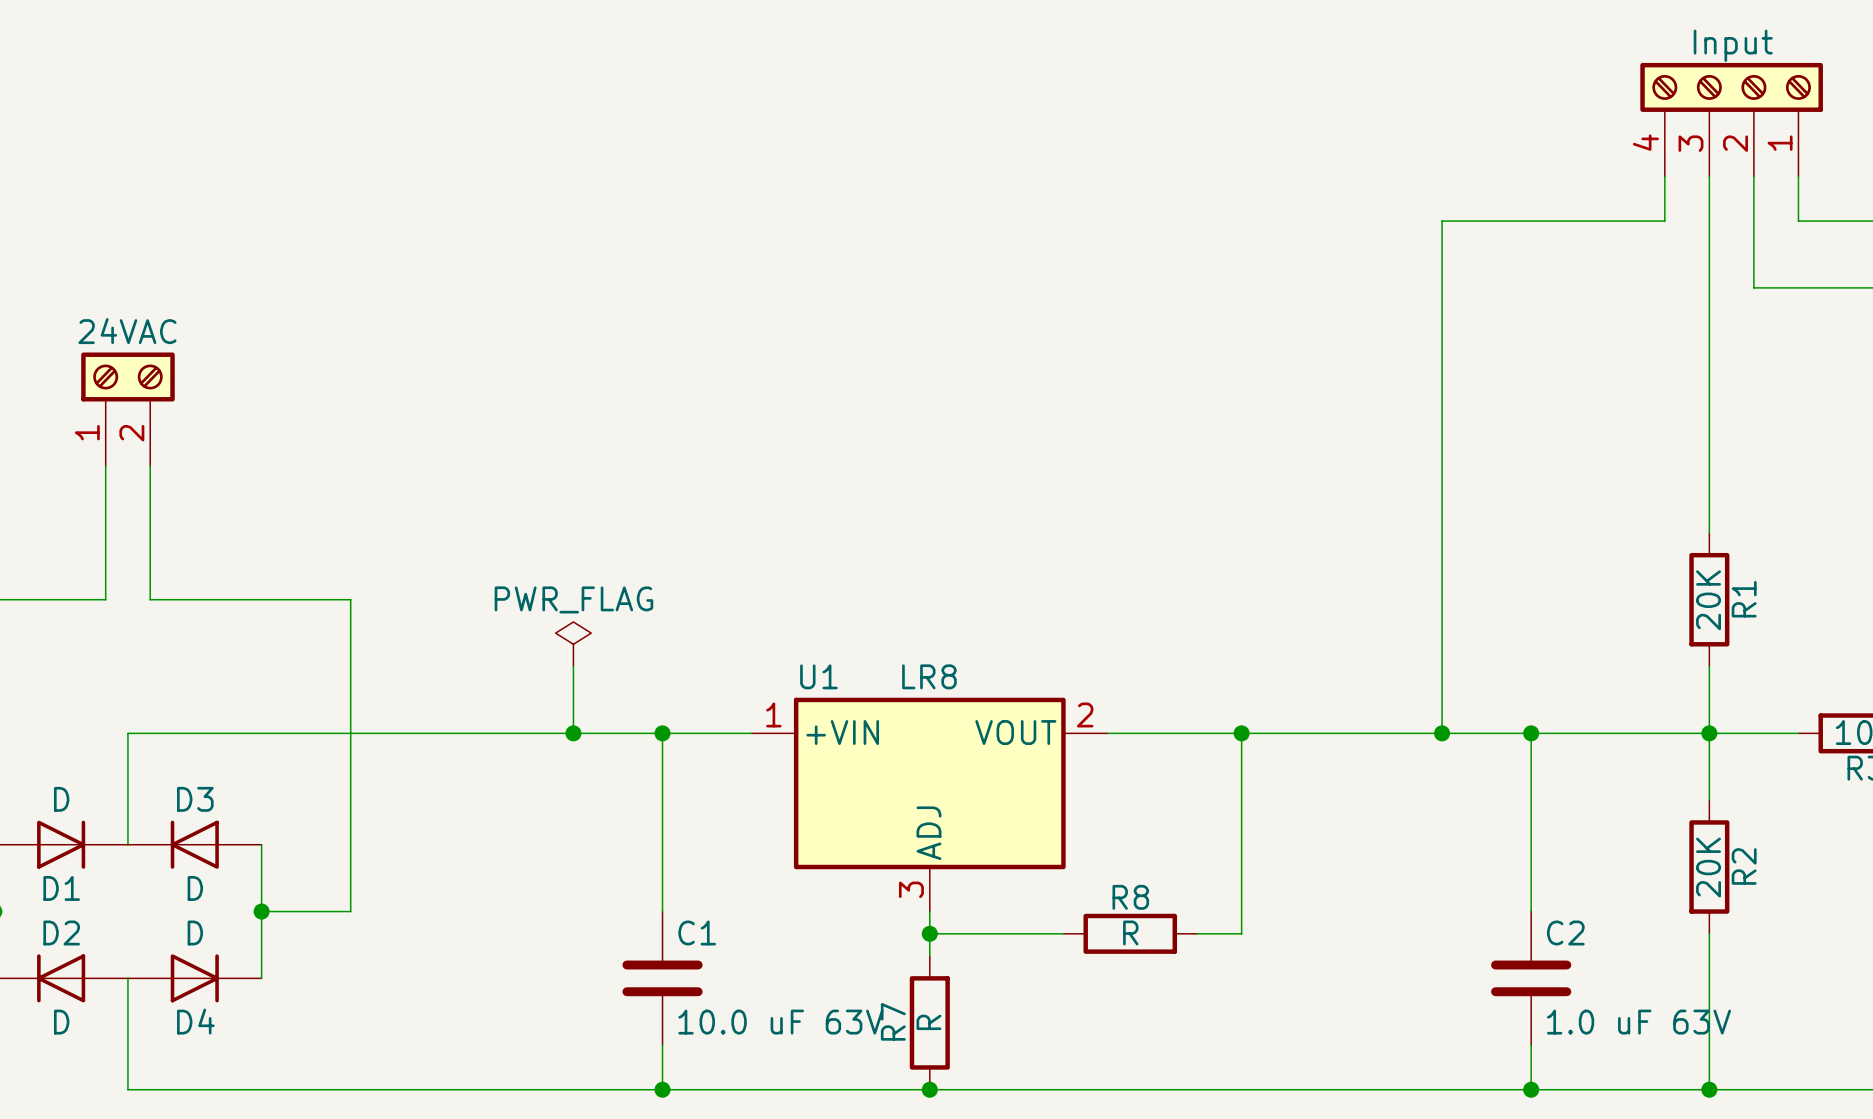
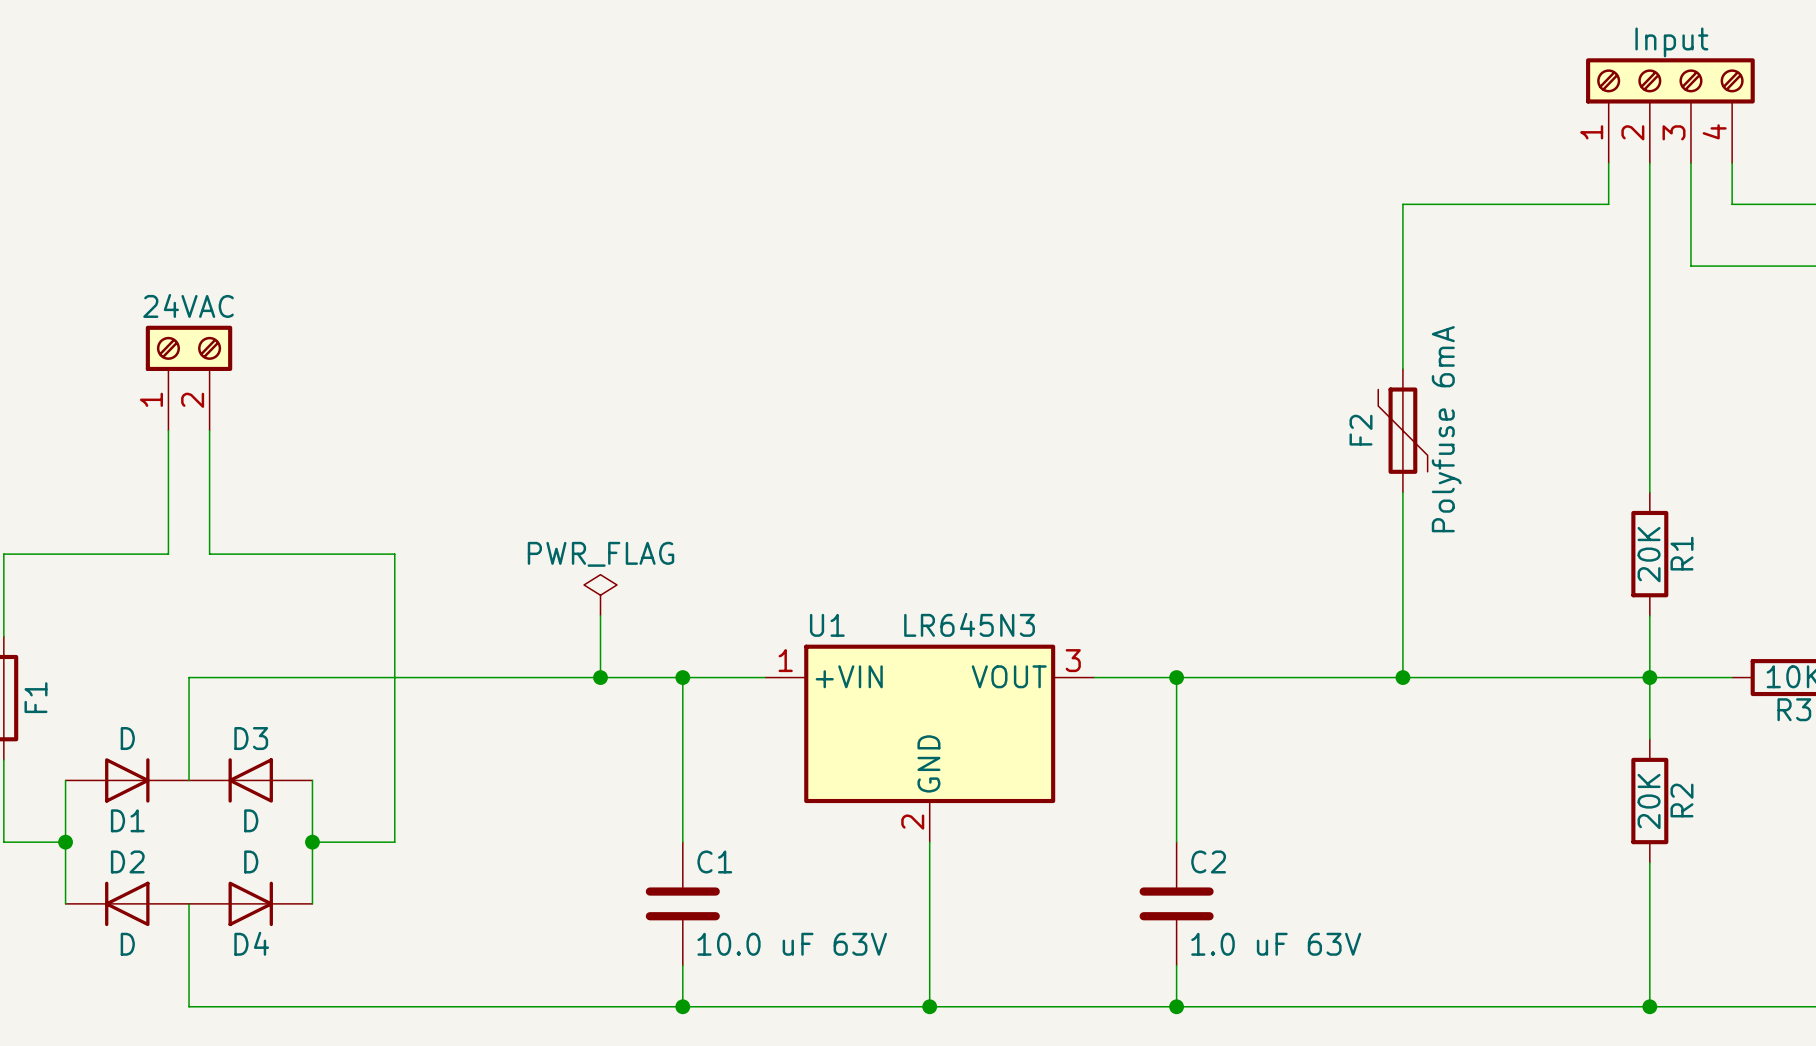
part flip: as is (1731, 87) -> left-right (1670, 80)
F2: none -> Polyfuse 6mA (1402, 430)
U1 value: LR8 (929, 676) -> LR645N3 (969, 624)
U1 pin number: 2 (1085, 714) -> 3 (1073, 660)
wire: (1241, 733) (1241, 933) (1197, 933) -> none
junction position: (1241, 733) -> (1176, 677)
wire: (1531, 733) (1531, 911) -> (1176, 677) (1176, 842)
junction: (1531, 733) -> none
U1 pin name: ADJ (928, 833) -> GND (928, 763)
U1 pin number: 3 (911, 889) -> 2 (912, 822)
wire: (929, 933) (1063, 933) -> none
junction: (929, 933) -> none
R8: R (1130, 933) -> none
wire: none -> (929, 883) (929, 1006)
C2 position: (1531, 978) -> (1176, 903)
R7: R (929, 1022) -> none
wire: (1531, 1045) (1531, 1089) -> (1176, 965) (1176, 1006)
junction: none -> (1176, 1006)
junction: (1531, 1089) -> none

